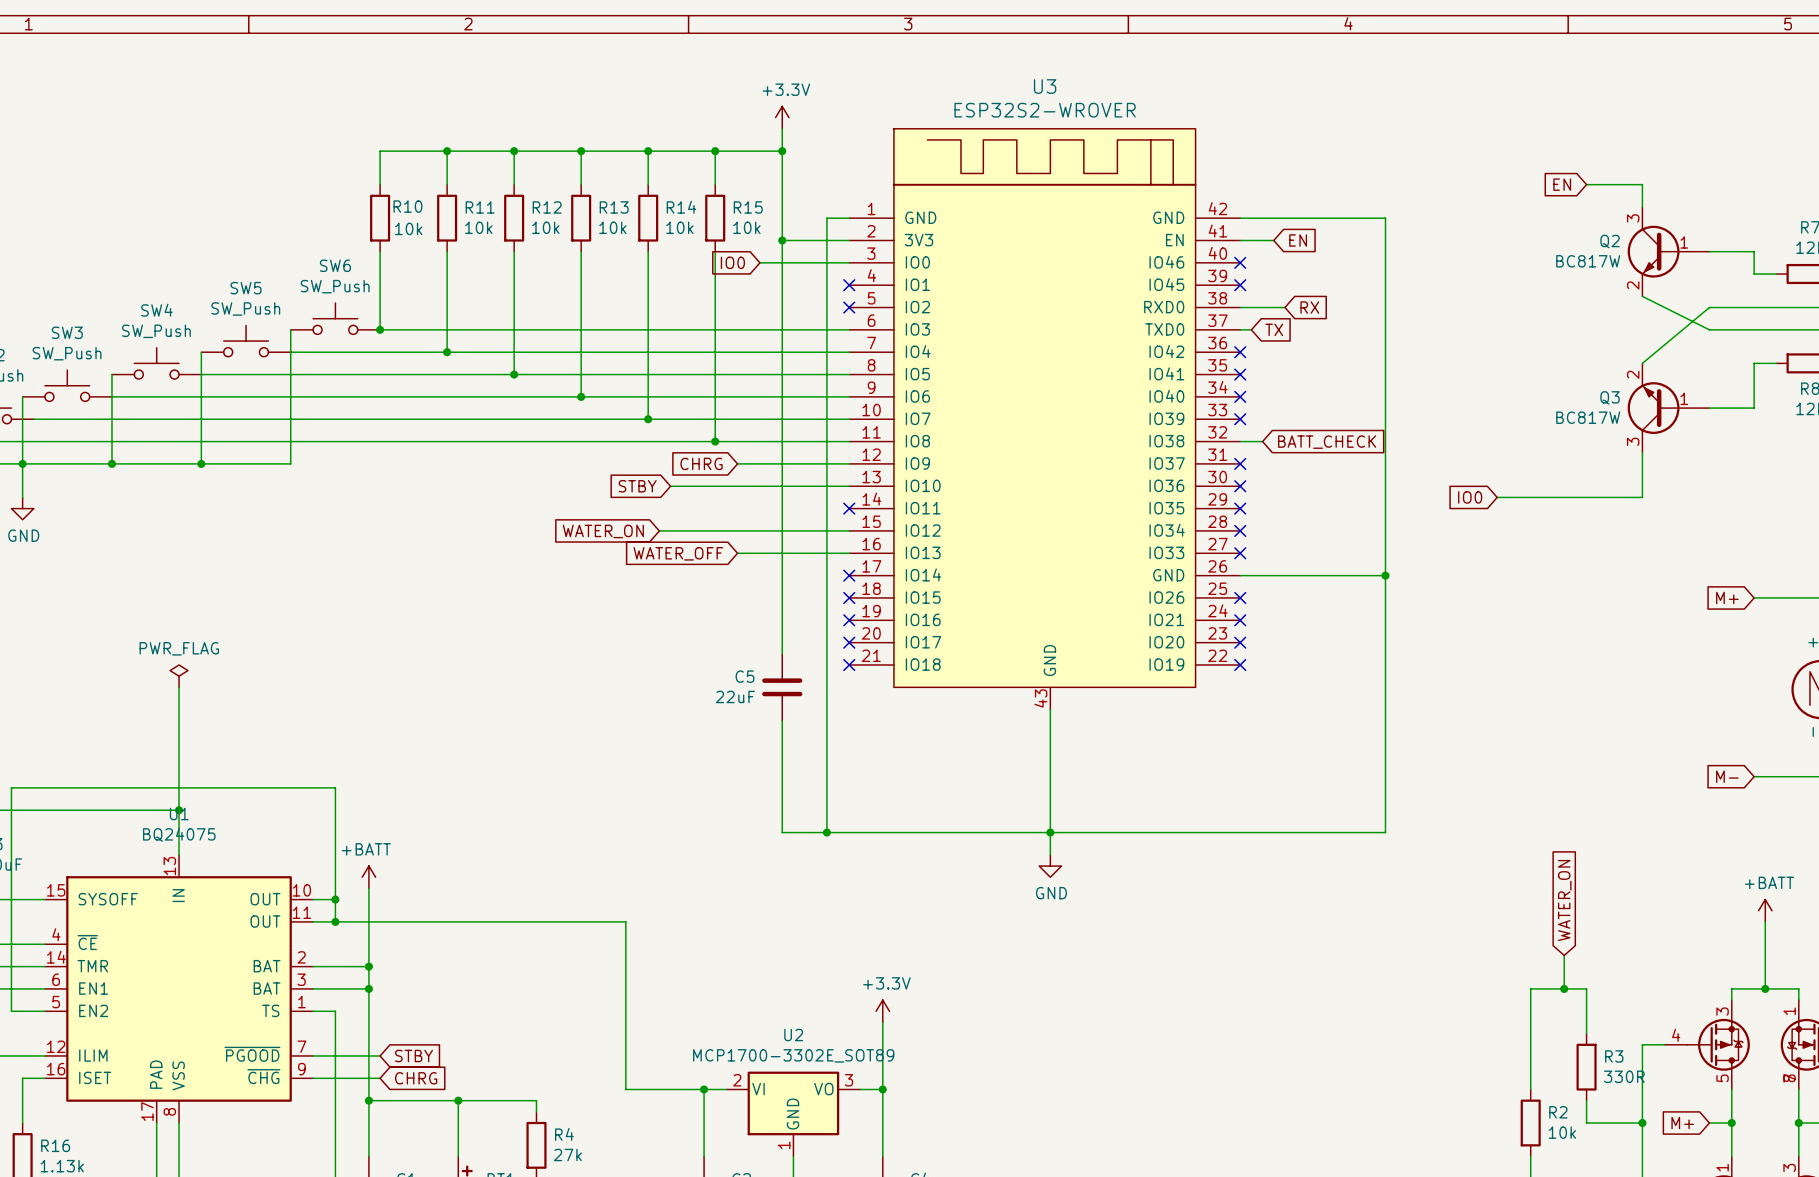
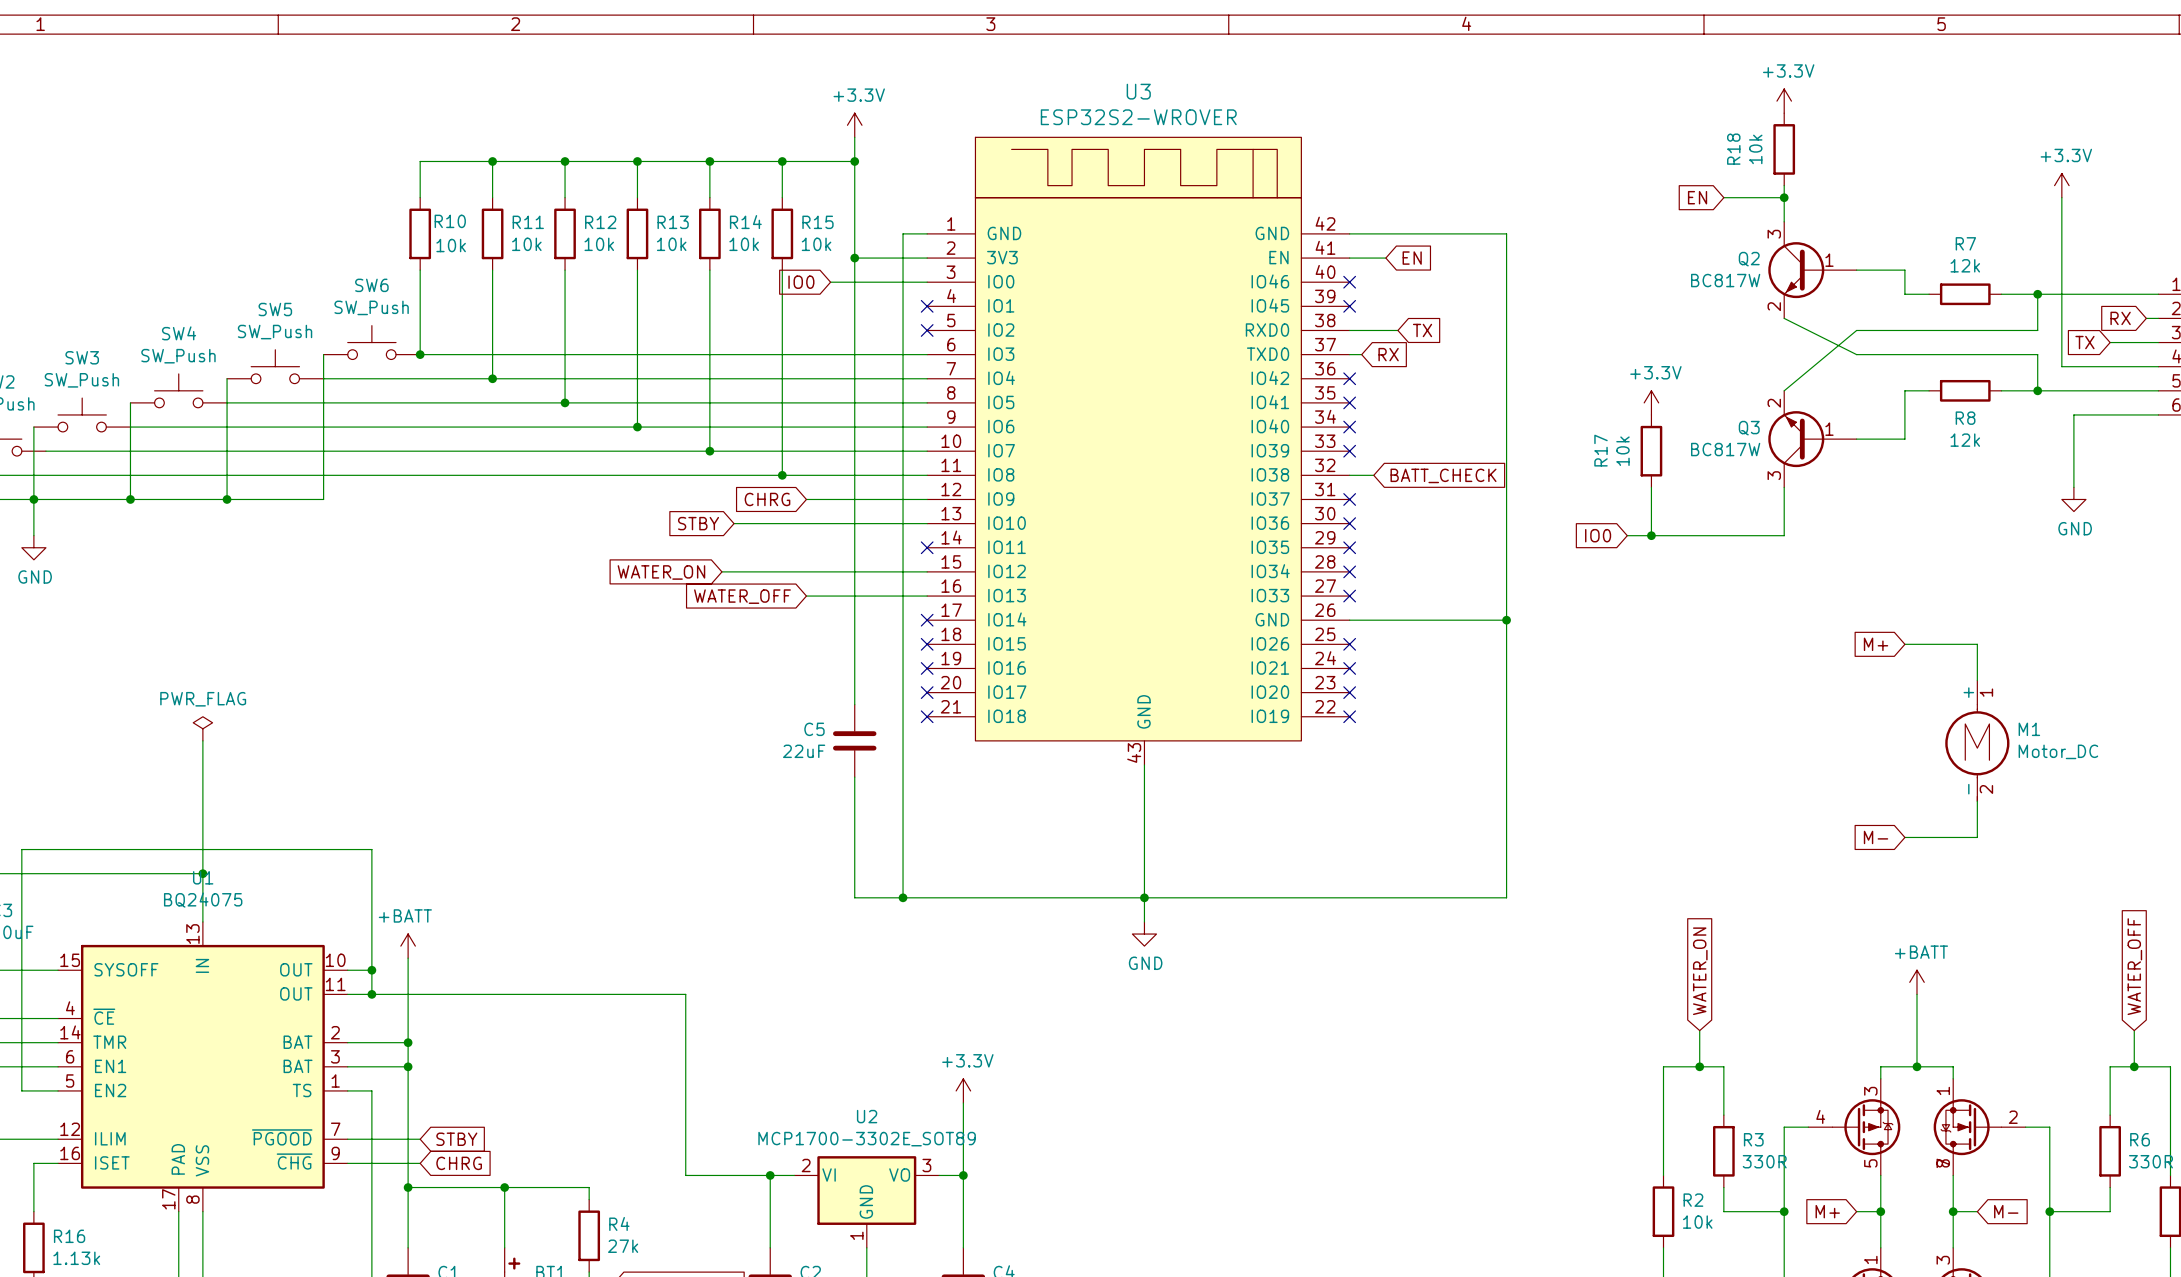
power symbol: none -> +3.3V (1784, 101)
R18: none -> 10k (1784, 149)
wire: none -> (1784, 185) (1784, 197)
junction: none -> (1784, 197)
global label: RX (1309, 307) -> TX (1422, 330)
global label: TX (1274, 329) -> RX (1388, 354)
power symbol: none -> +3.3V (1651, 402)
R17: none -> 10k (1651, 451)
wire: none -> (1651, 487) (1651, 535)
junction: none -> (1651, 535)

